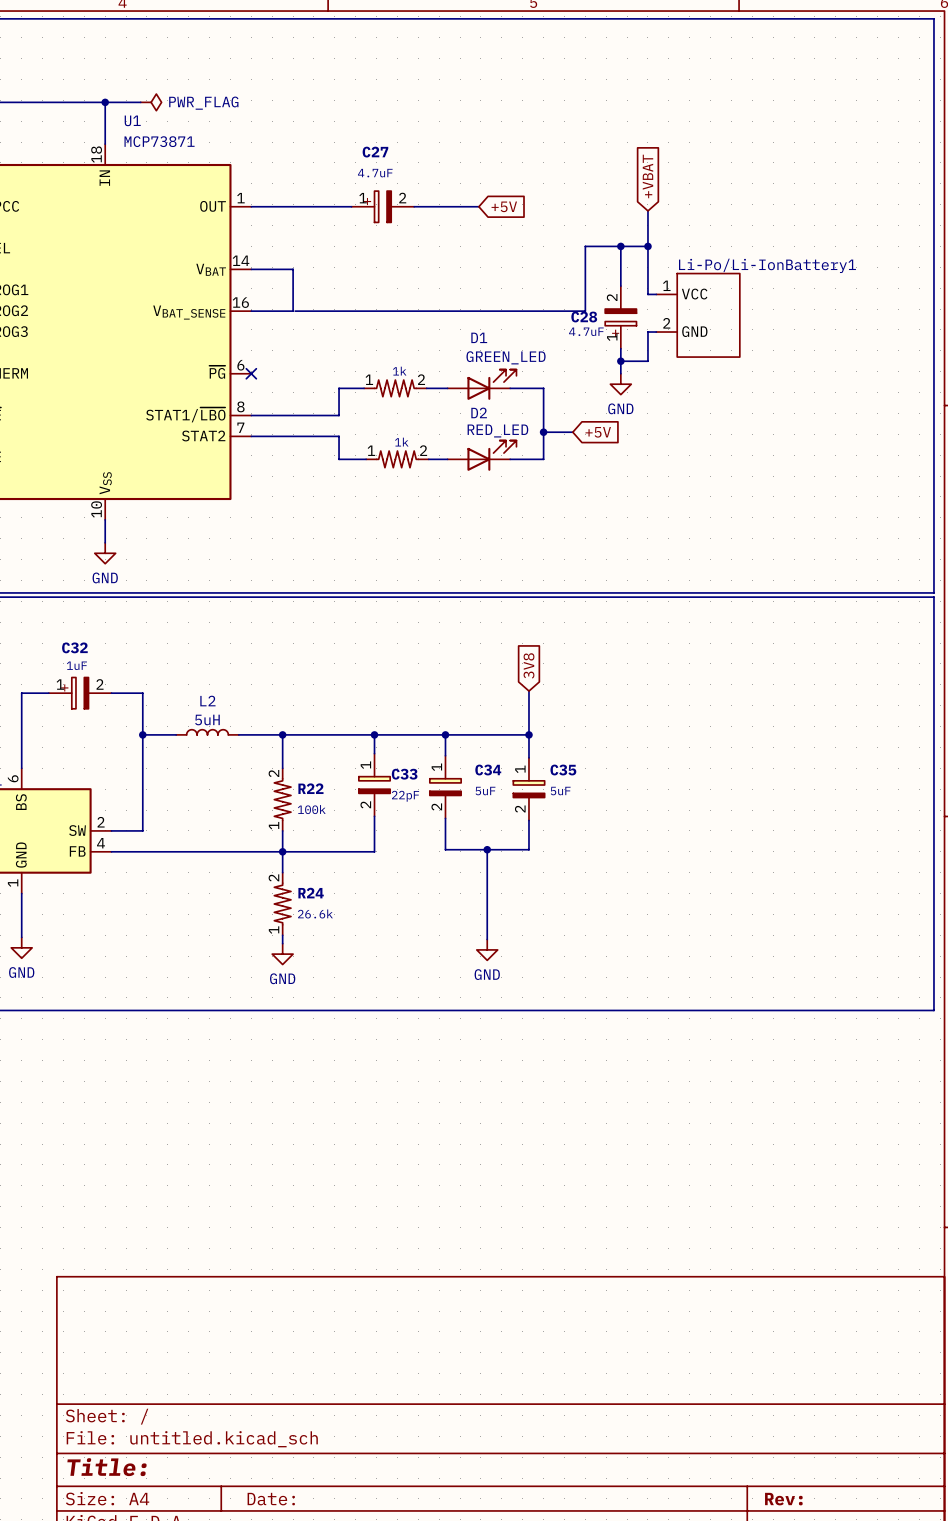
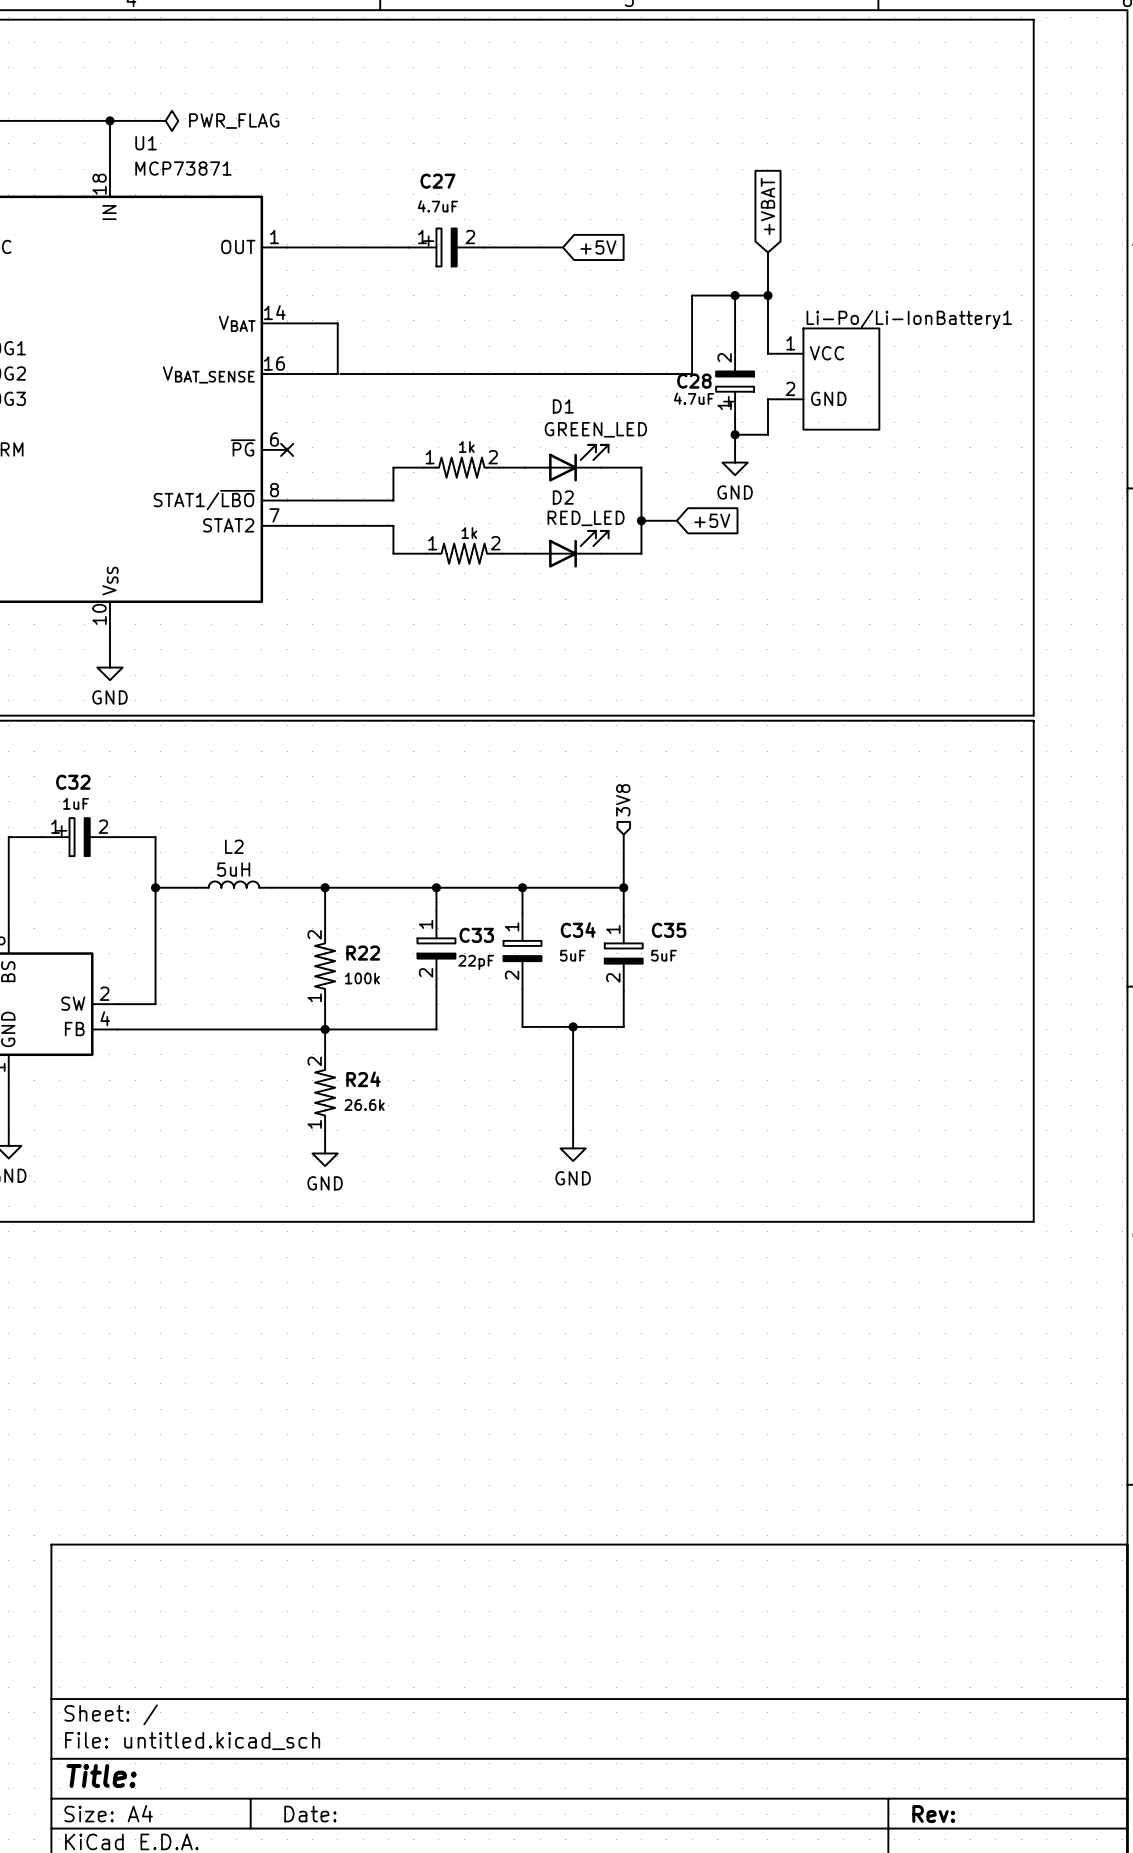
line: (867, 18) (933, 18) (933, 592) (867, 592) -> (1033, 19) (1033, 715)
line: (867, 597) (933, 597) (933, 1010) (867, 1010) -> (1033, 720) (1033, 1221)
hierarchical label: none -> 3V8 (623, 800)
global label: 3V8 (528, 665) -> none

